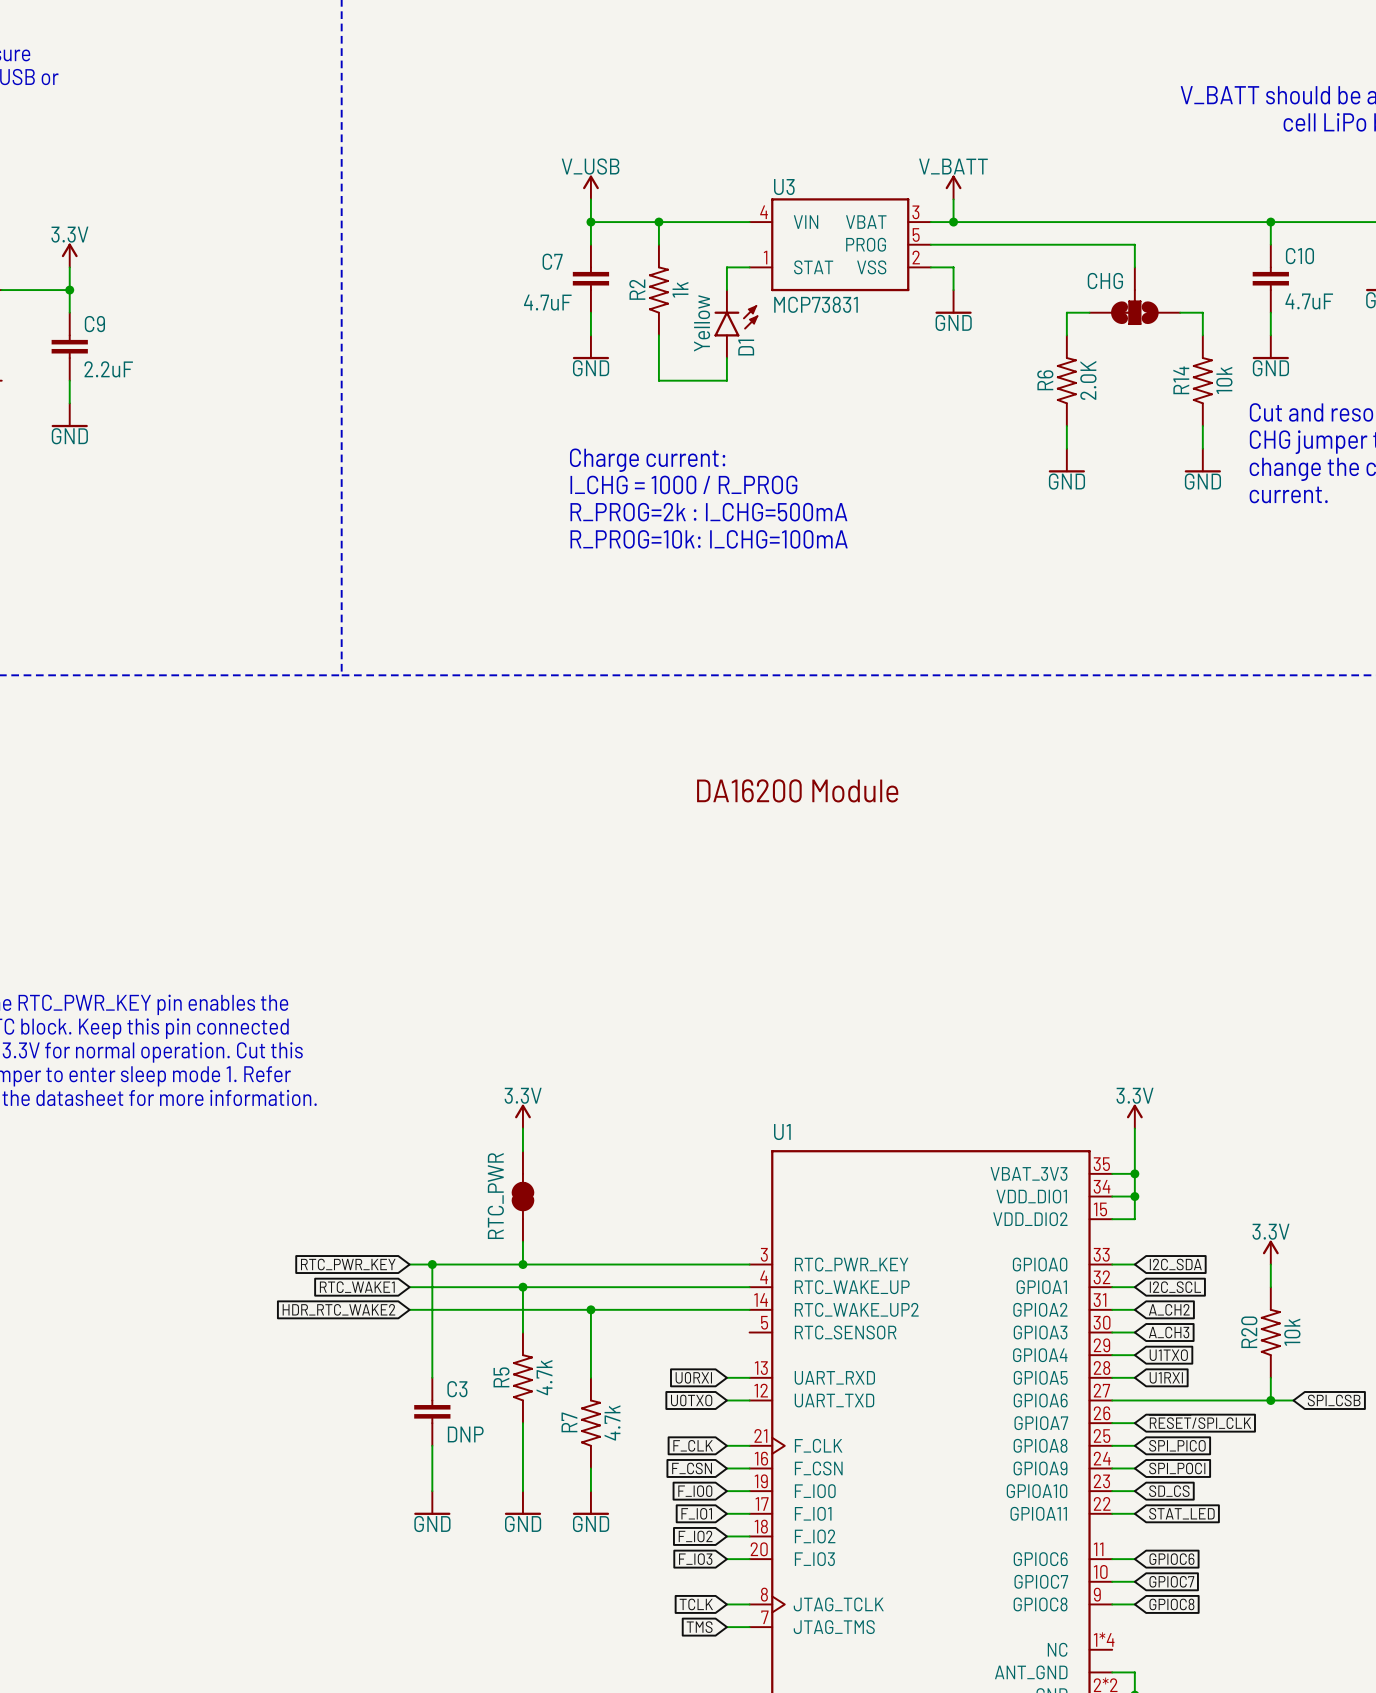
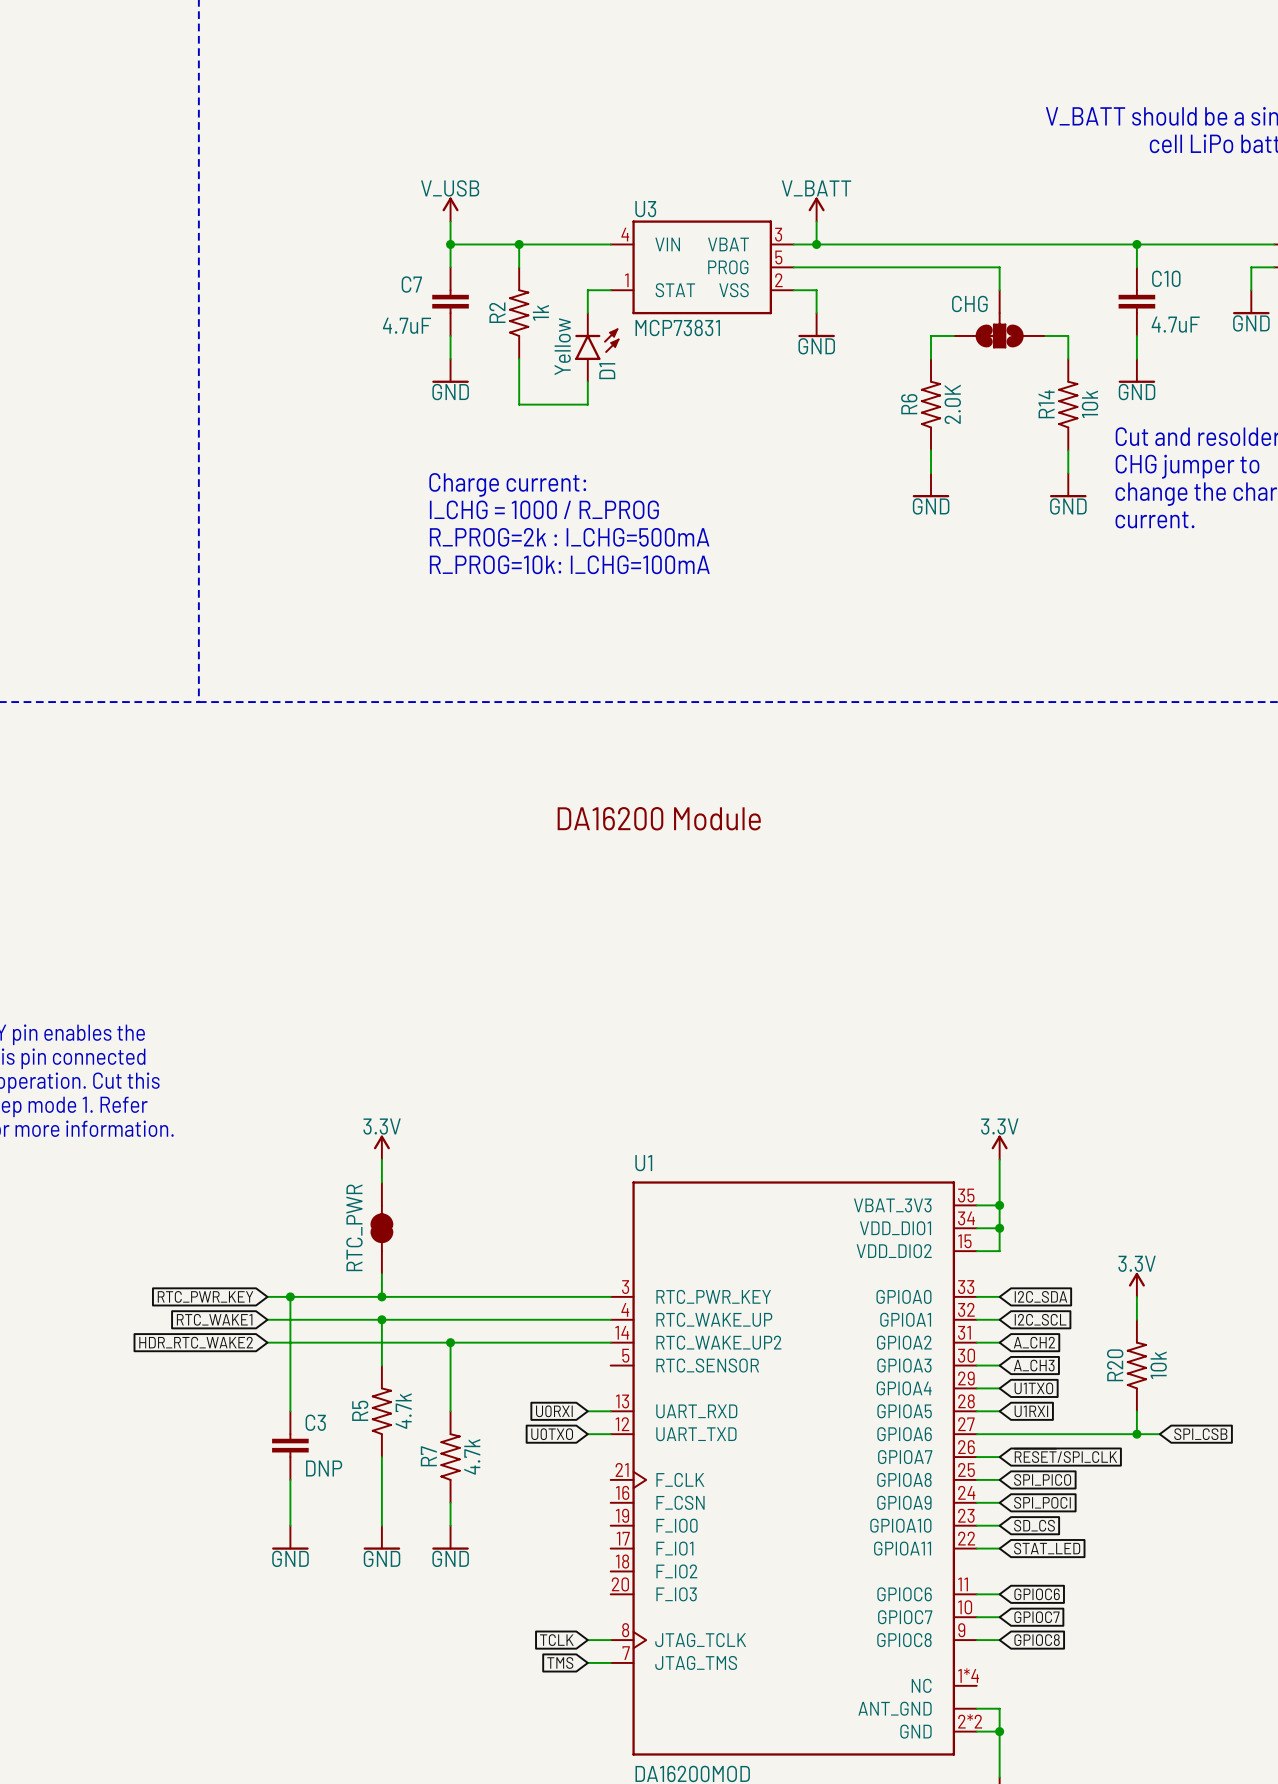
global label: F_CLK (693, 1445) -> none
wire: (726, 1445) (749, 1445) -> none
global label: F_CSN (692, 1468) -> none
wire: (726, 1468) (749, 1468) -> none
global label: F_IO0 (695, 1491) -> none
wire: (726, 1491) (749, 1491) -> none
global label: F_IO1 (696, 1513) -> none
wire: (726, 1513) (749, 1513) -> none
global label: F_IO2 (695, 1536) -> none
wire: (726, 1536) (749, 1536) -> none
global label: F_IO3 (695, 1559) -> none
wire: (726, 1559) (749, 1559) -> none

